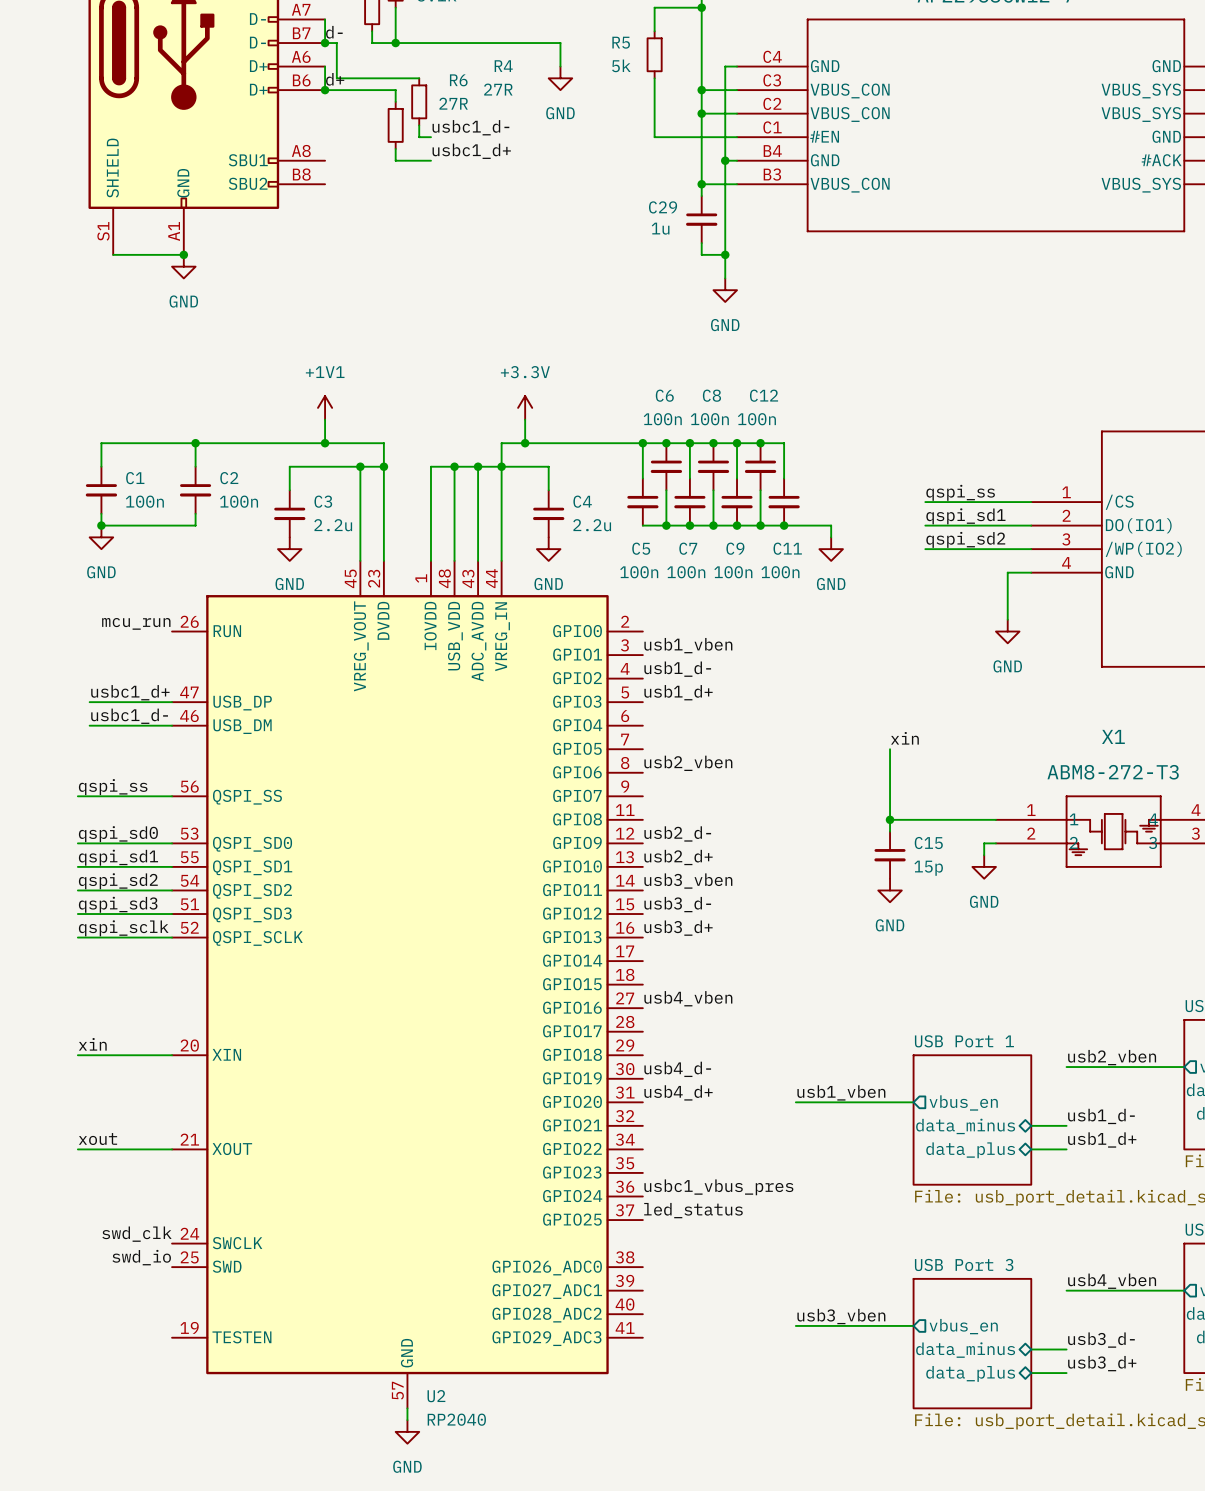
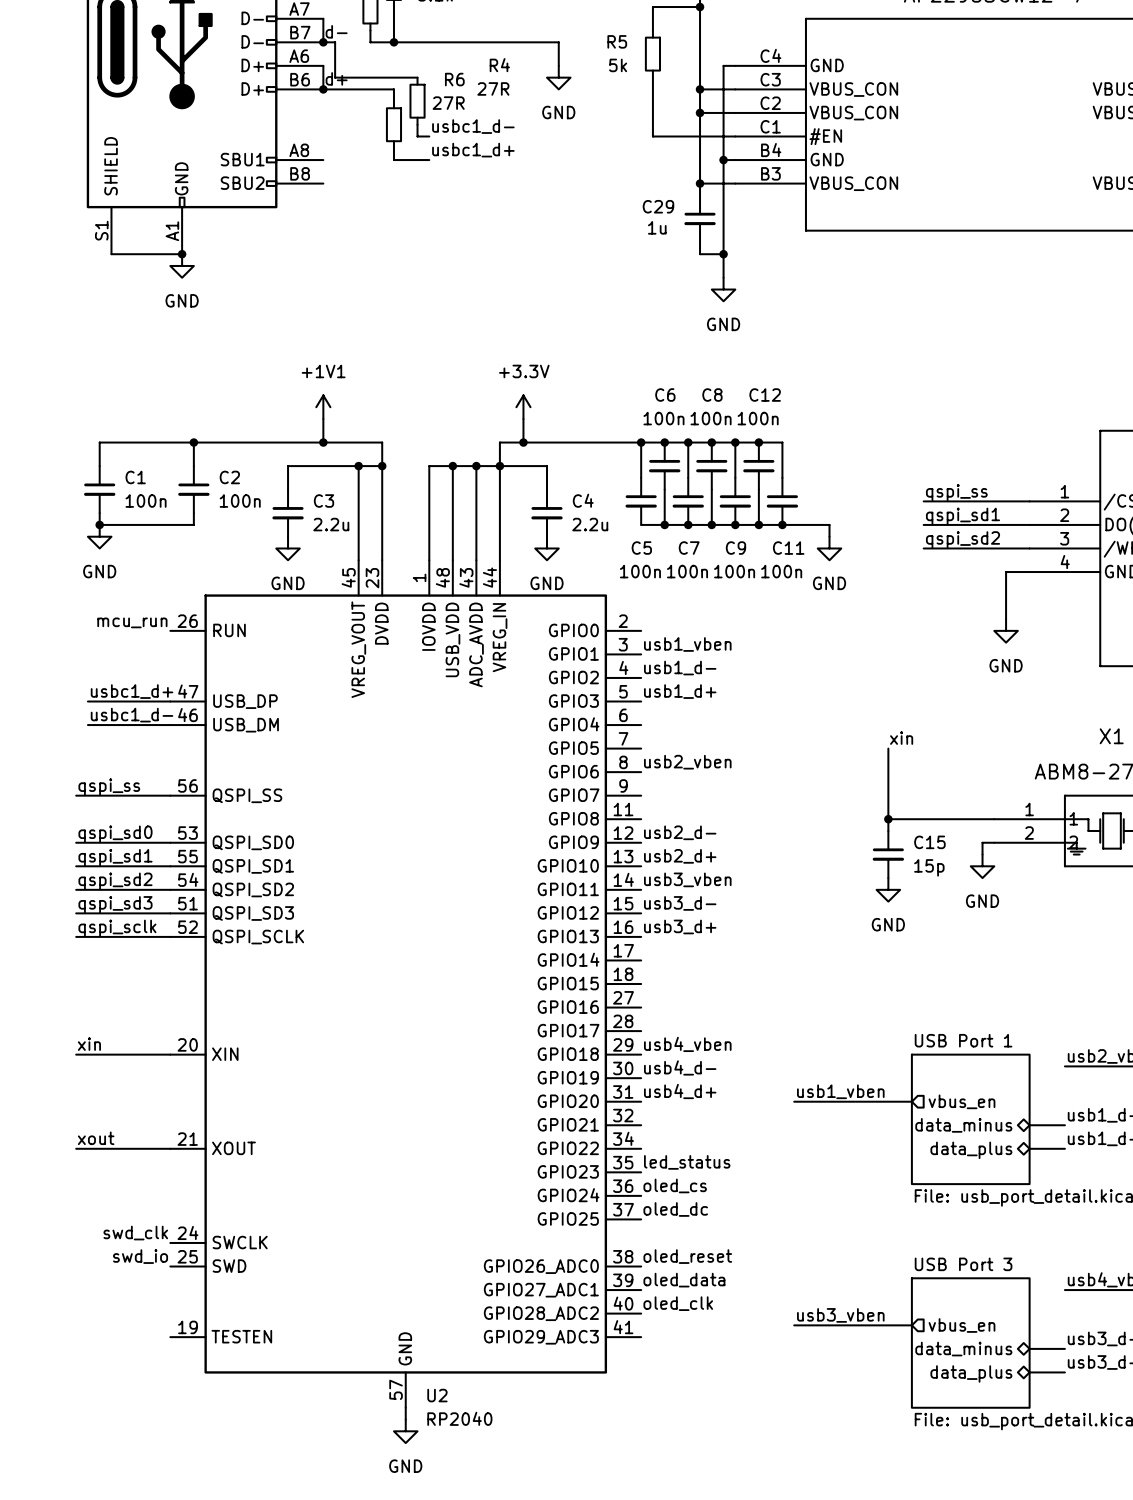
label position: usb4_vben (688, 998) -> usb4_vben (687, 1044)
label: none -> led_status (687, 1162)
label: usbc1_vbus_pres (718, 1187) -> oled_cs (675, 1185)
label: led_status (693, 1210) -> oled_dc (675, 1209)
label: none -> oled_reset (687, 1256)
label: none -> oled_data (684, 1280)
label: none -> oled_clk (678, 1303)

